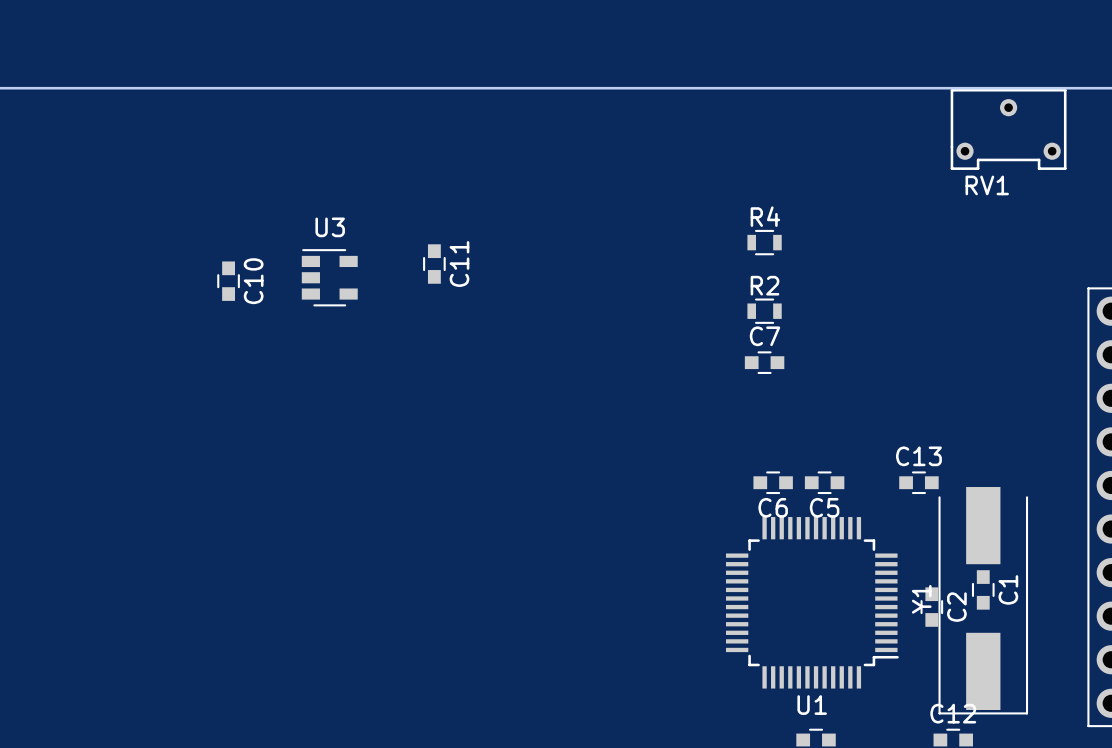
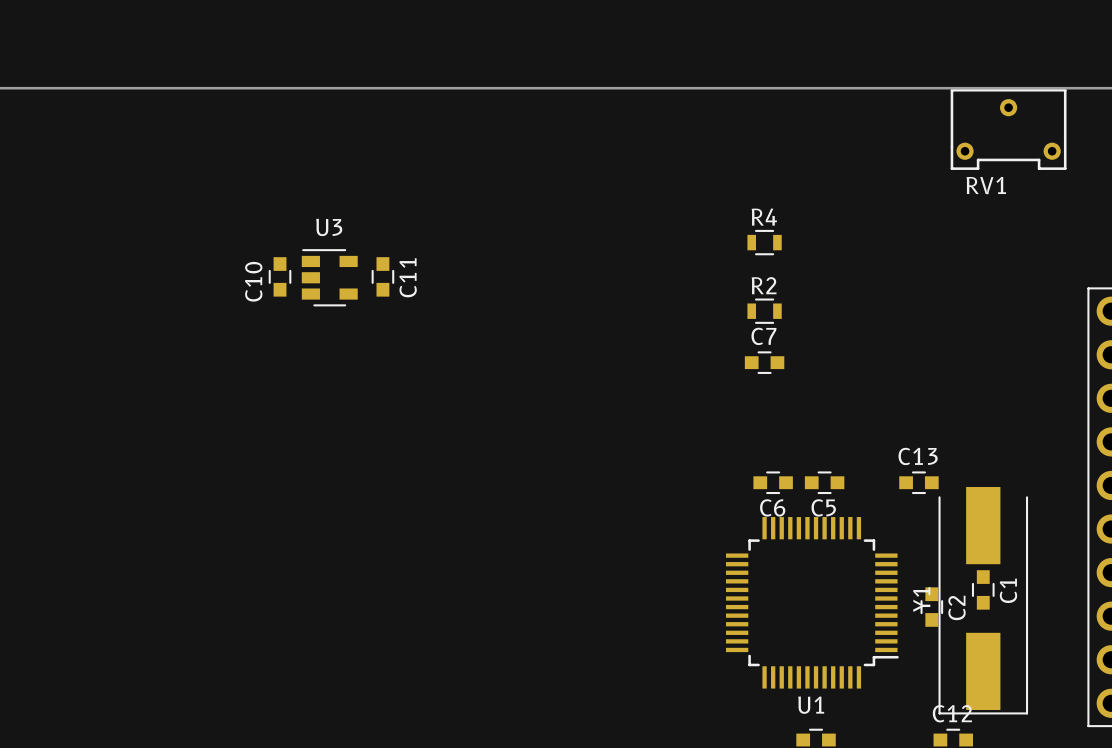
C11 position: (434, 264) -> (382, 276)
C10 position: (228, 281) -> (280, 276)

